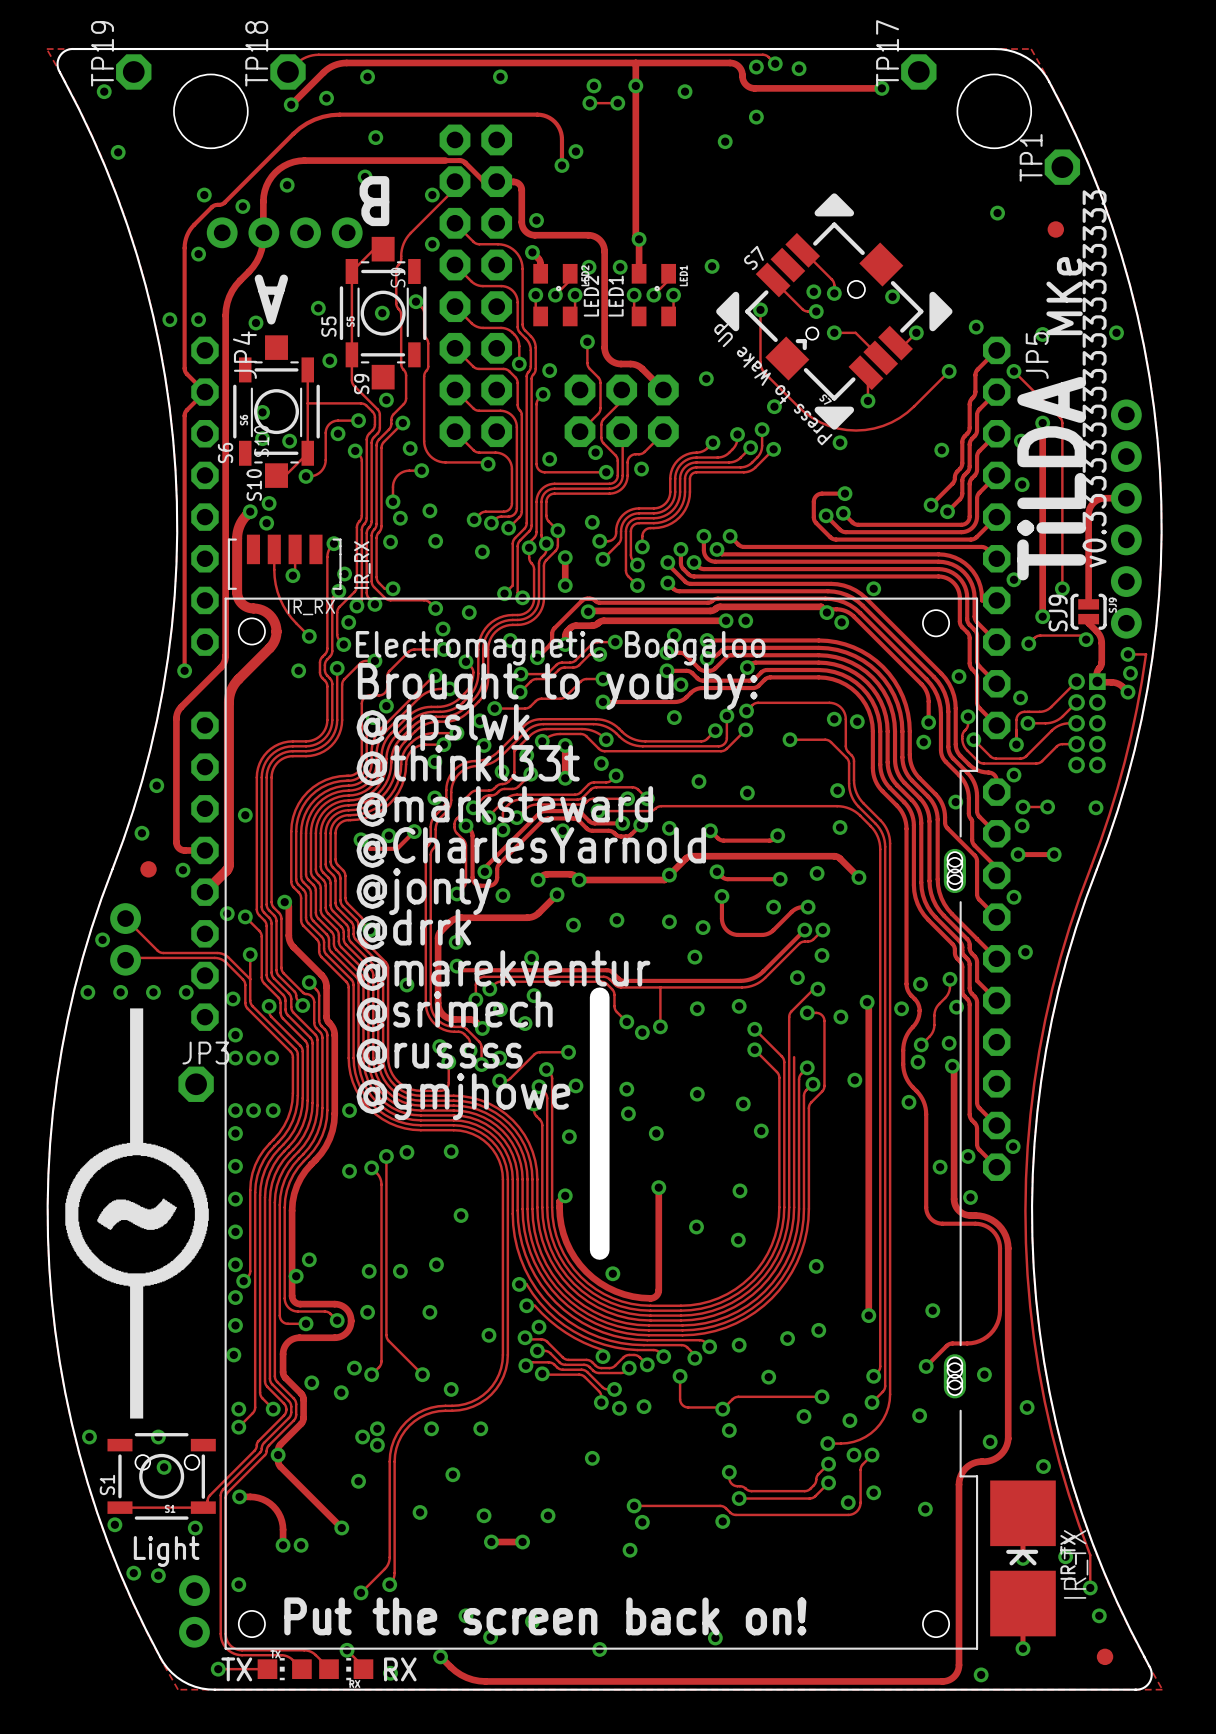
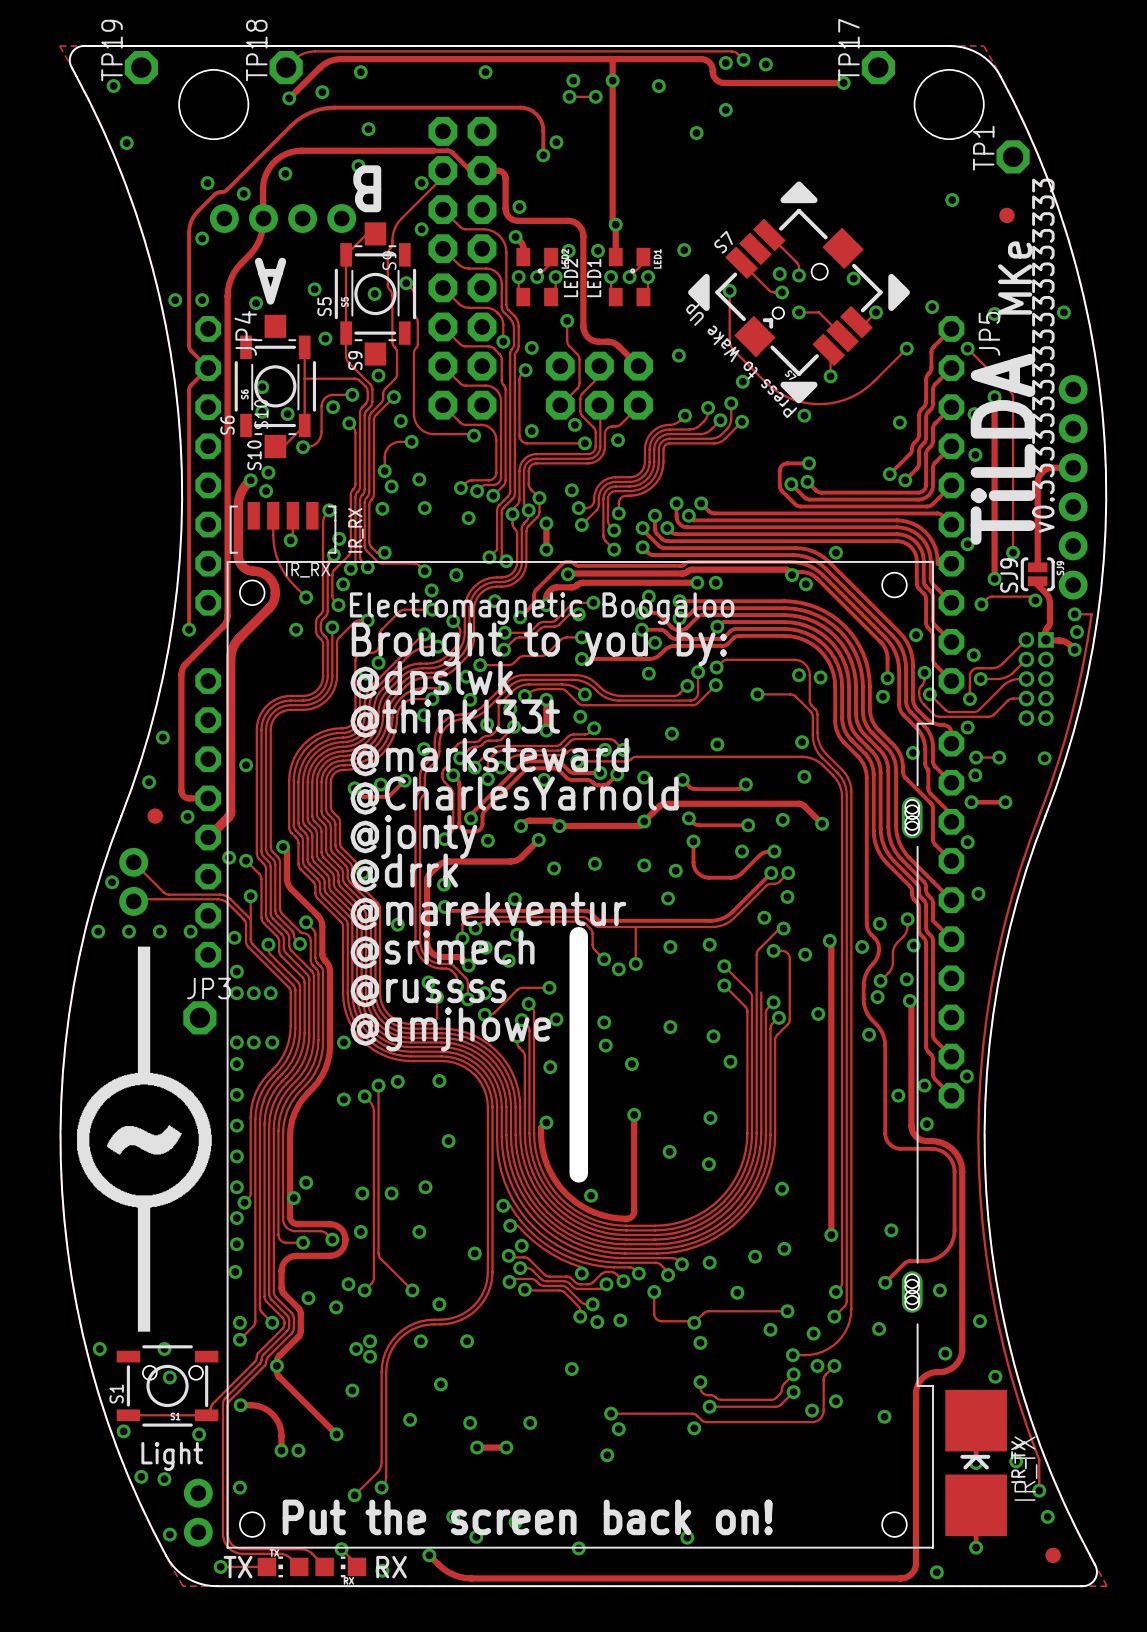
via: none -> (169, 1534)

